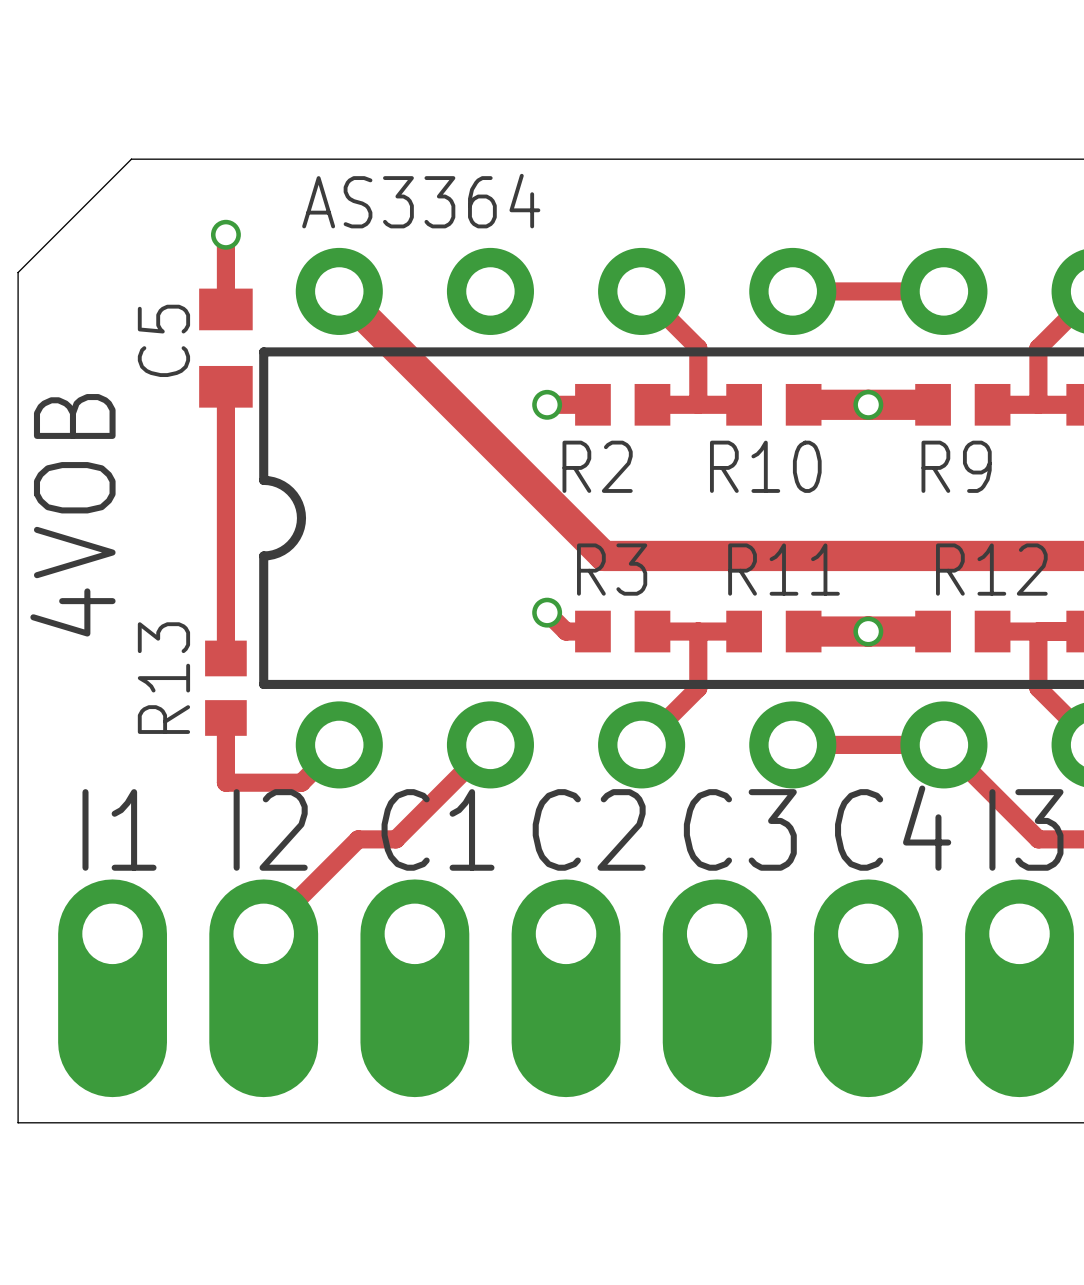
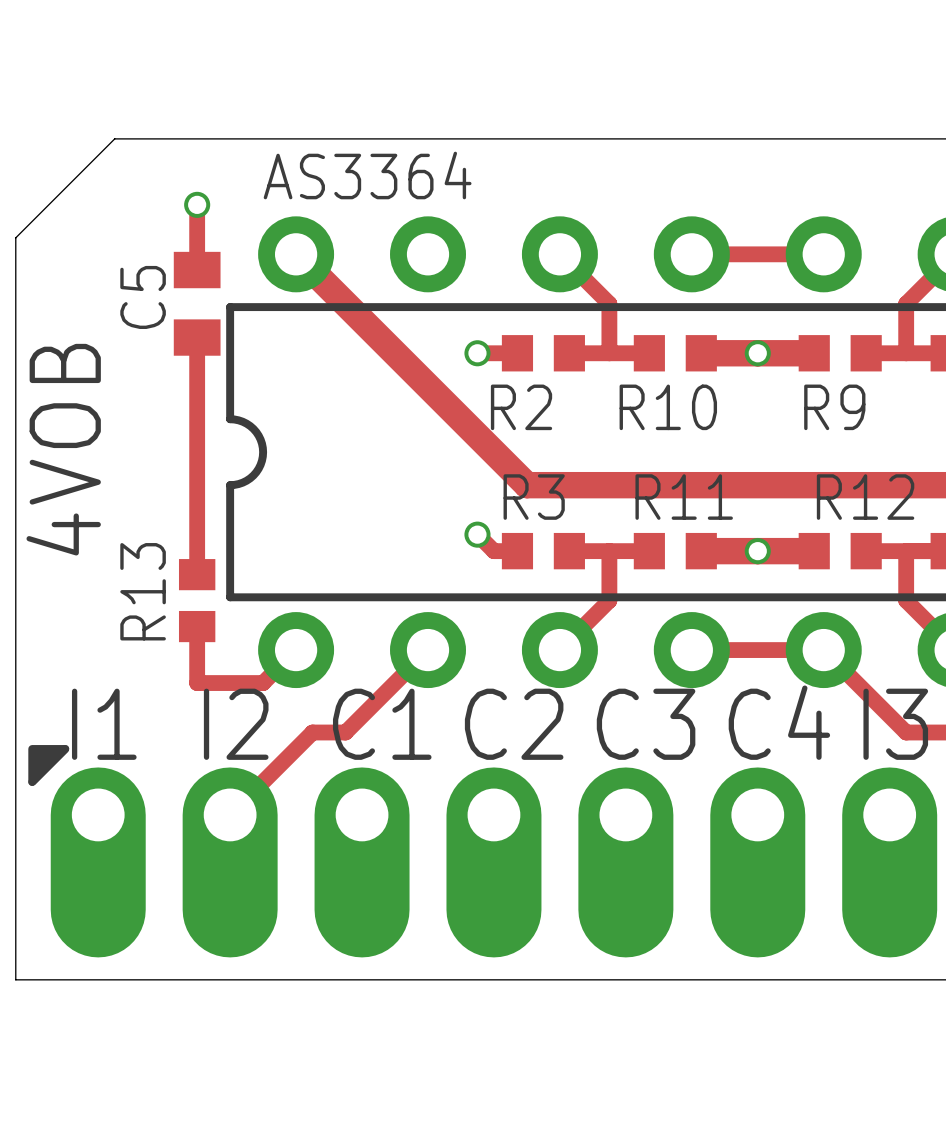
part footprint: [511, 879, 621, 1098] -> [28, 745, 938, 958]

